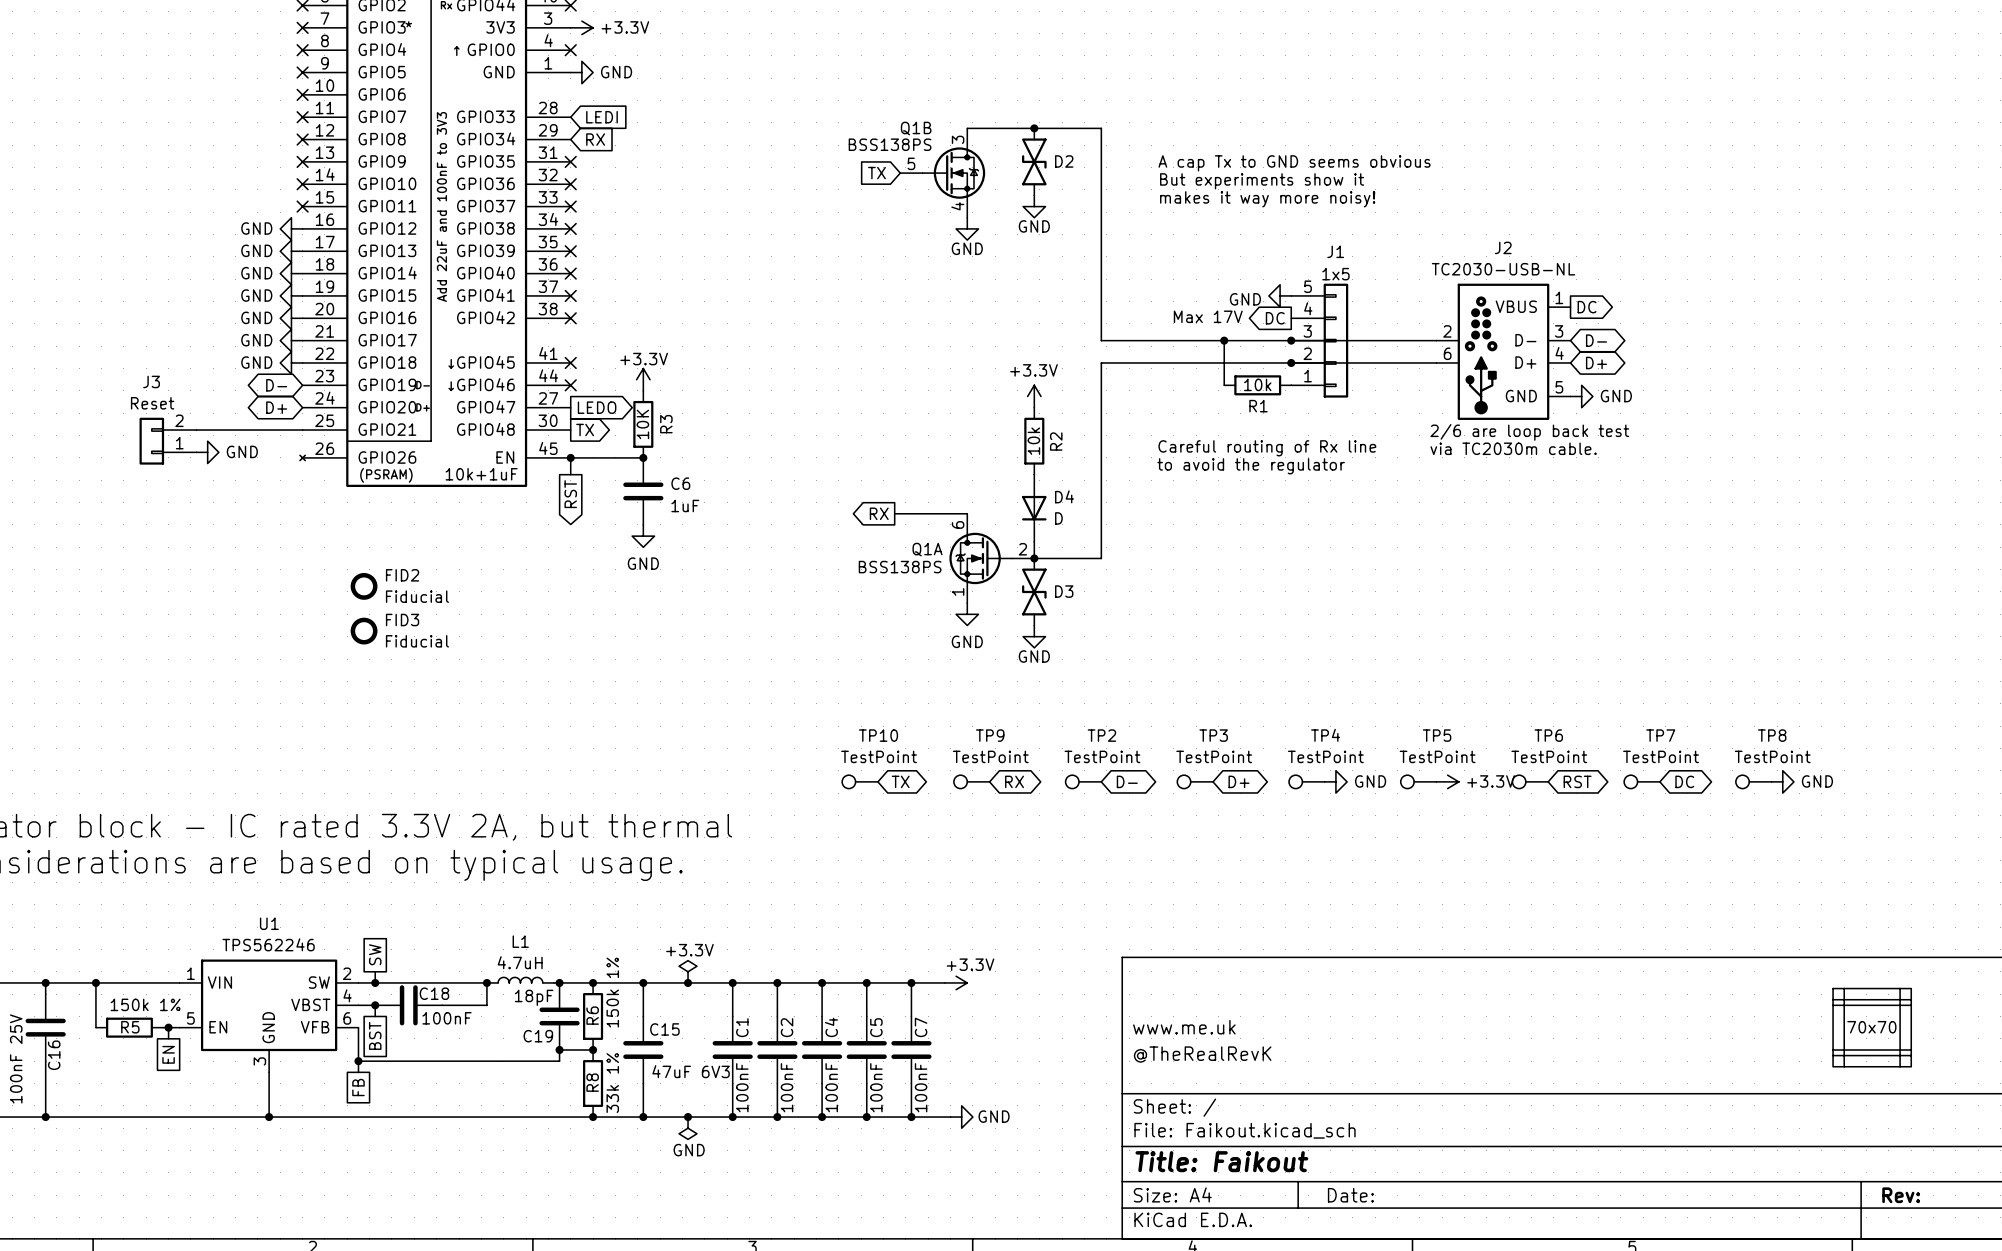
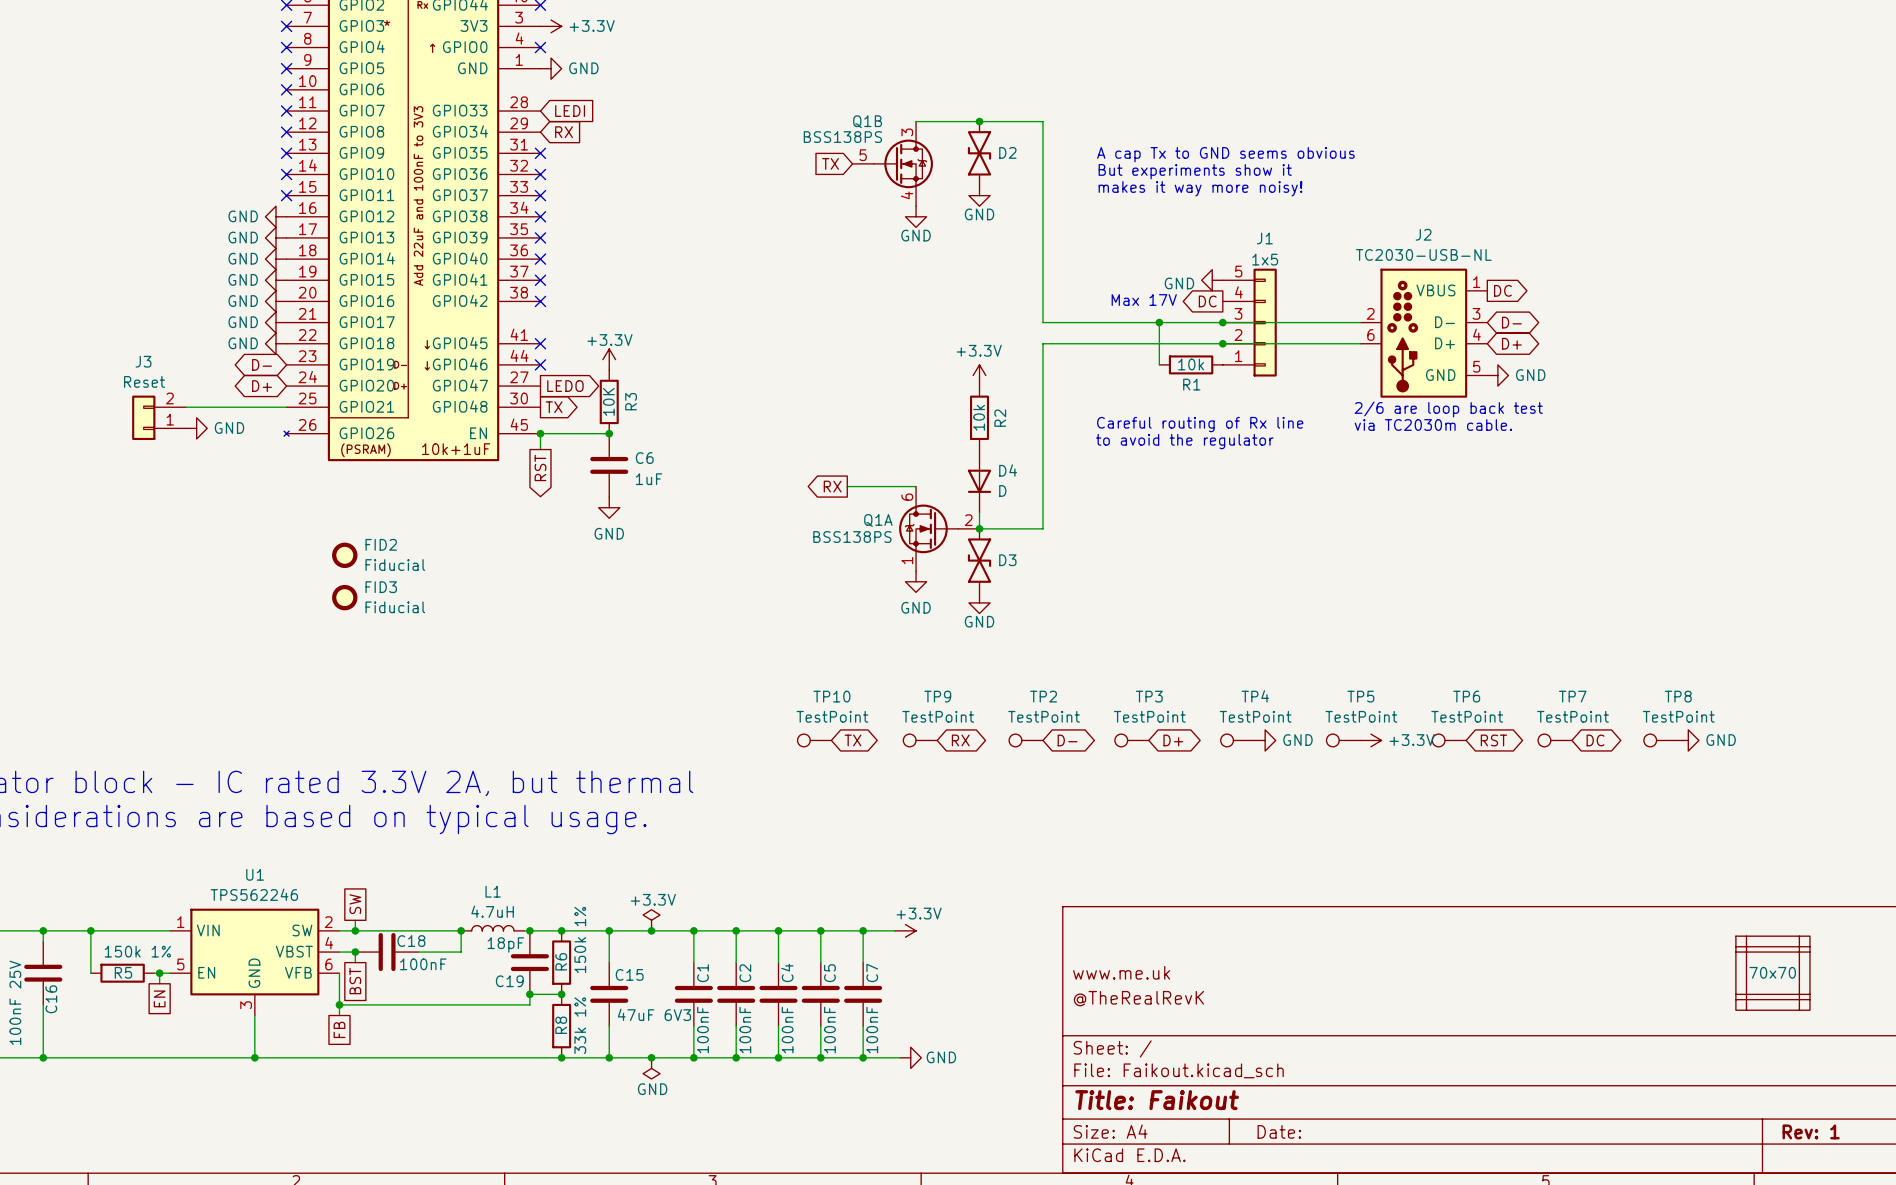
title block: Rev: (1901, 1195) -> Rev: 1 (1811, 1131)

